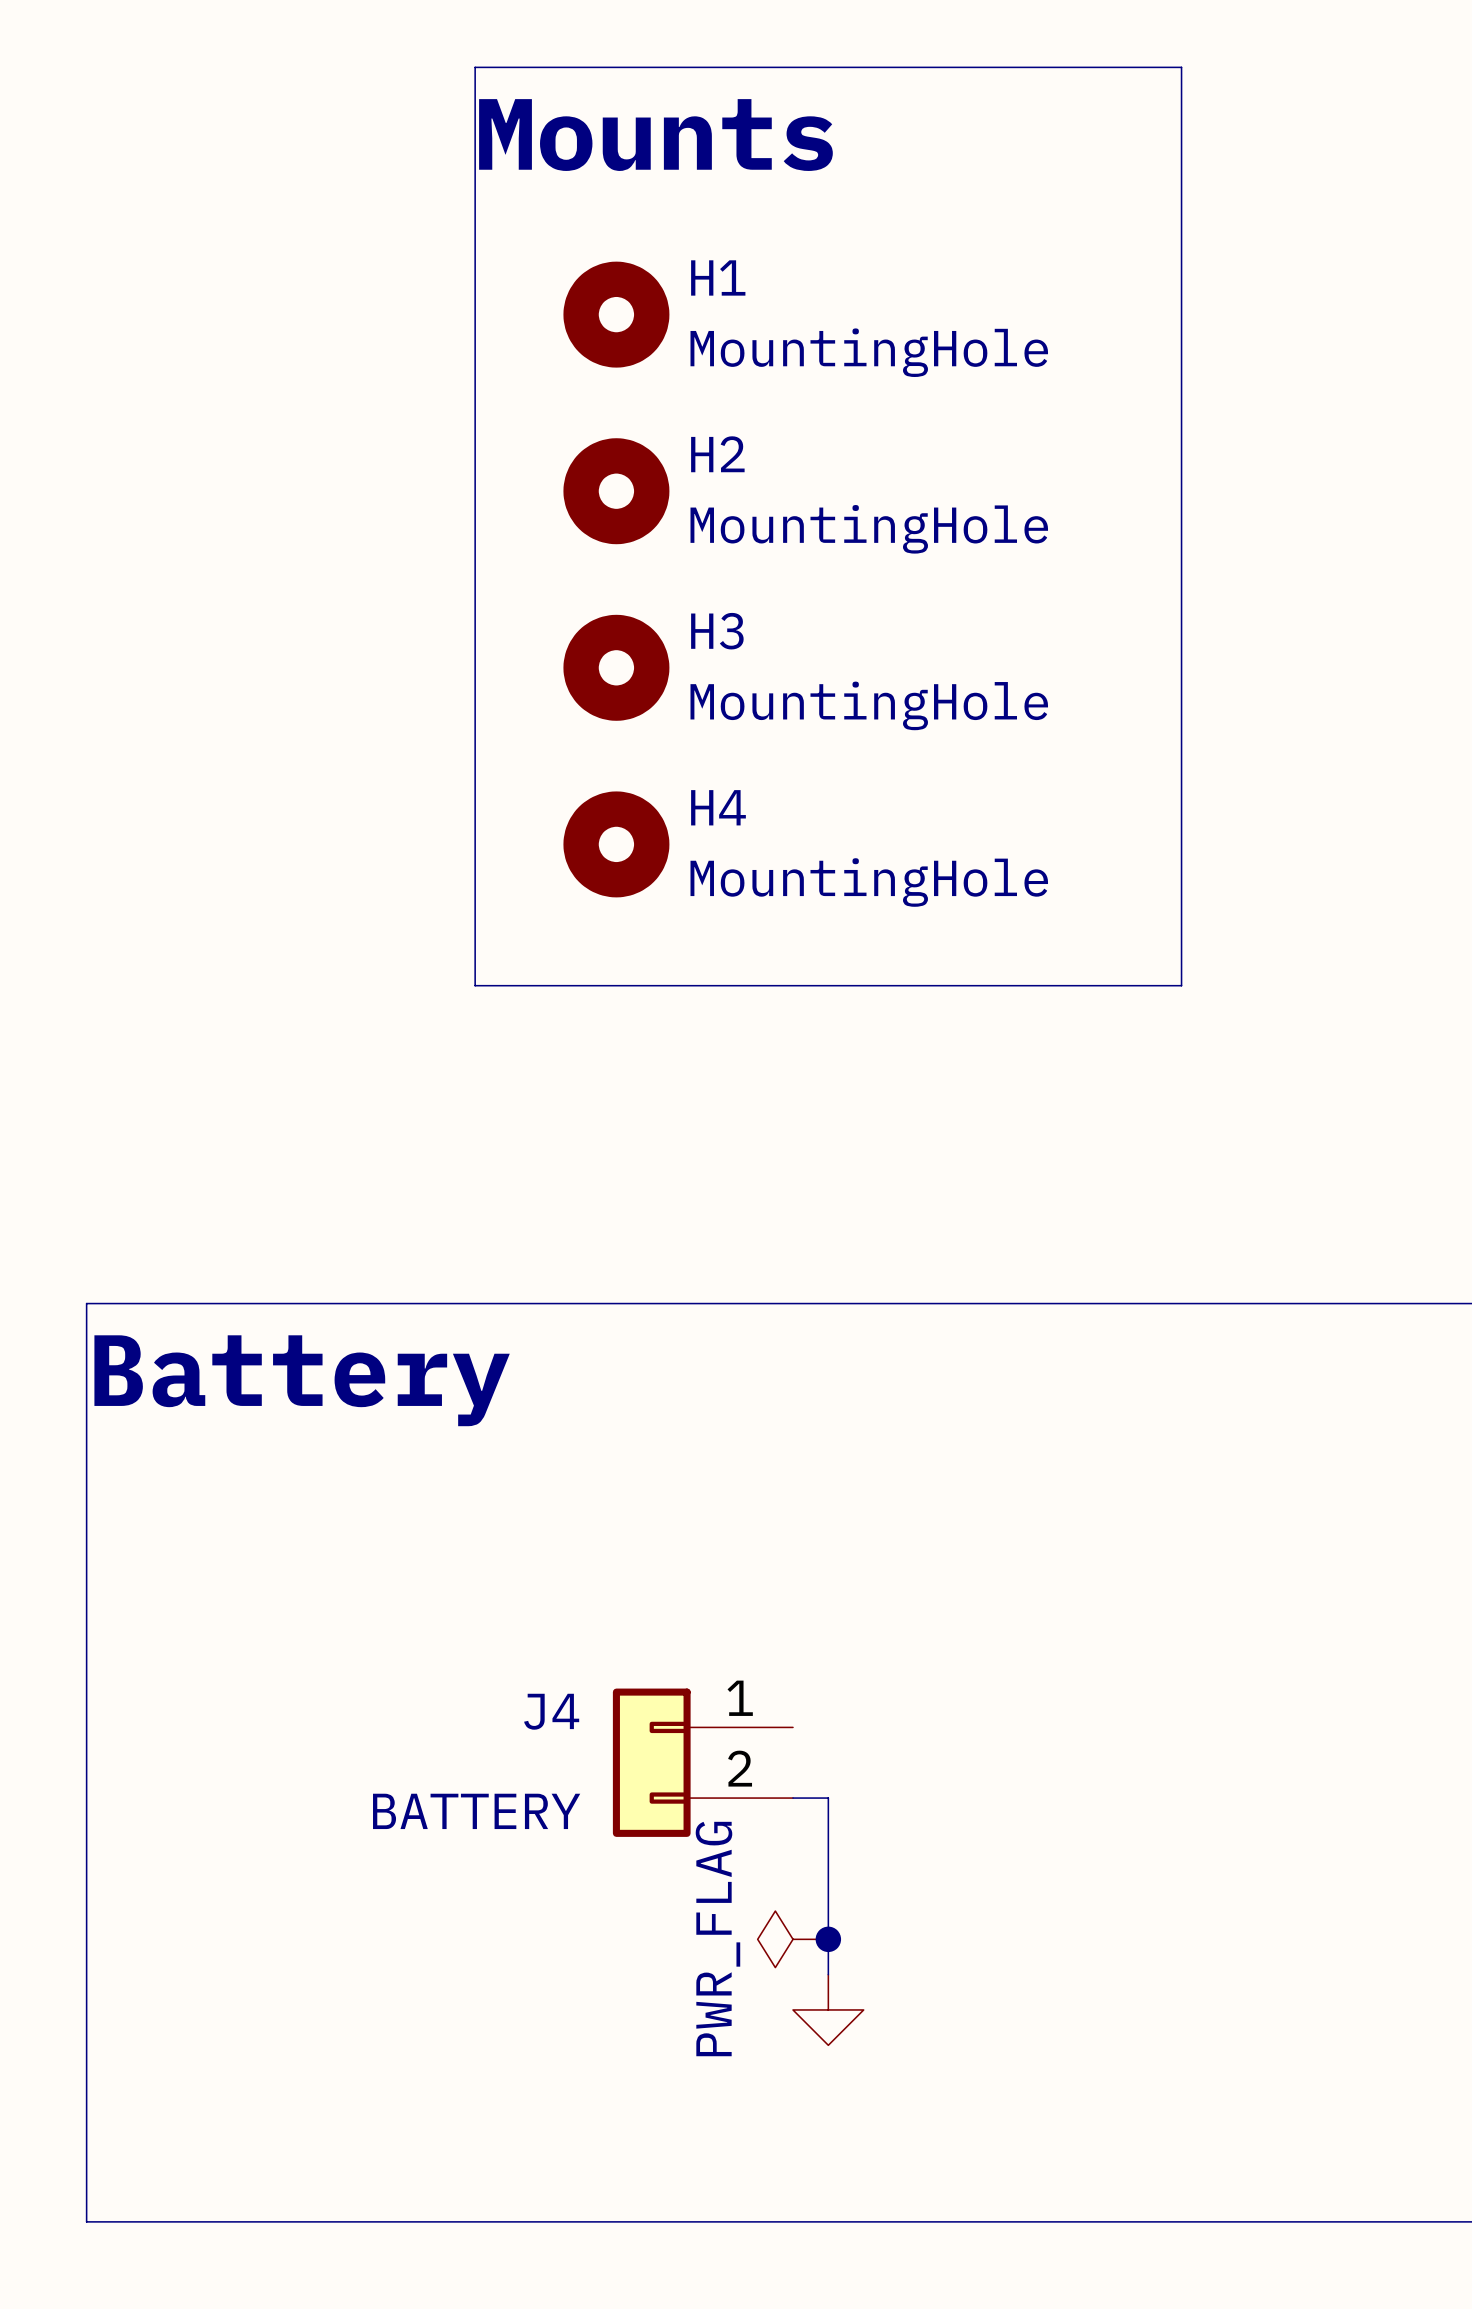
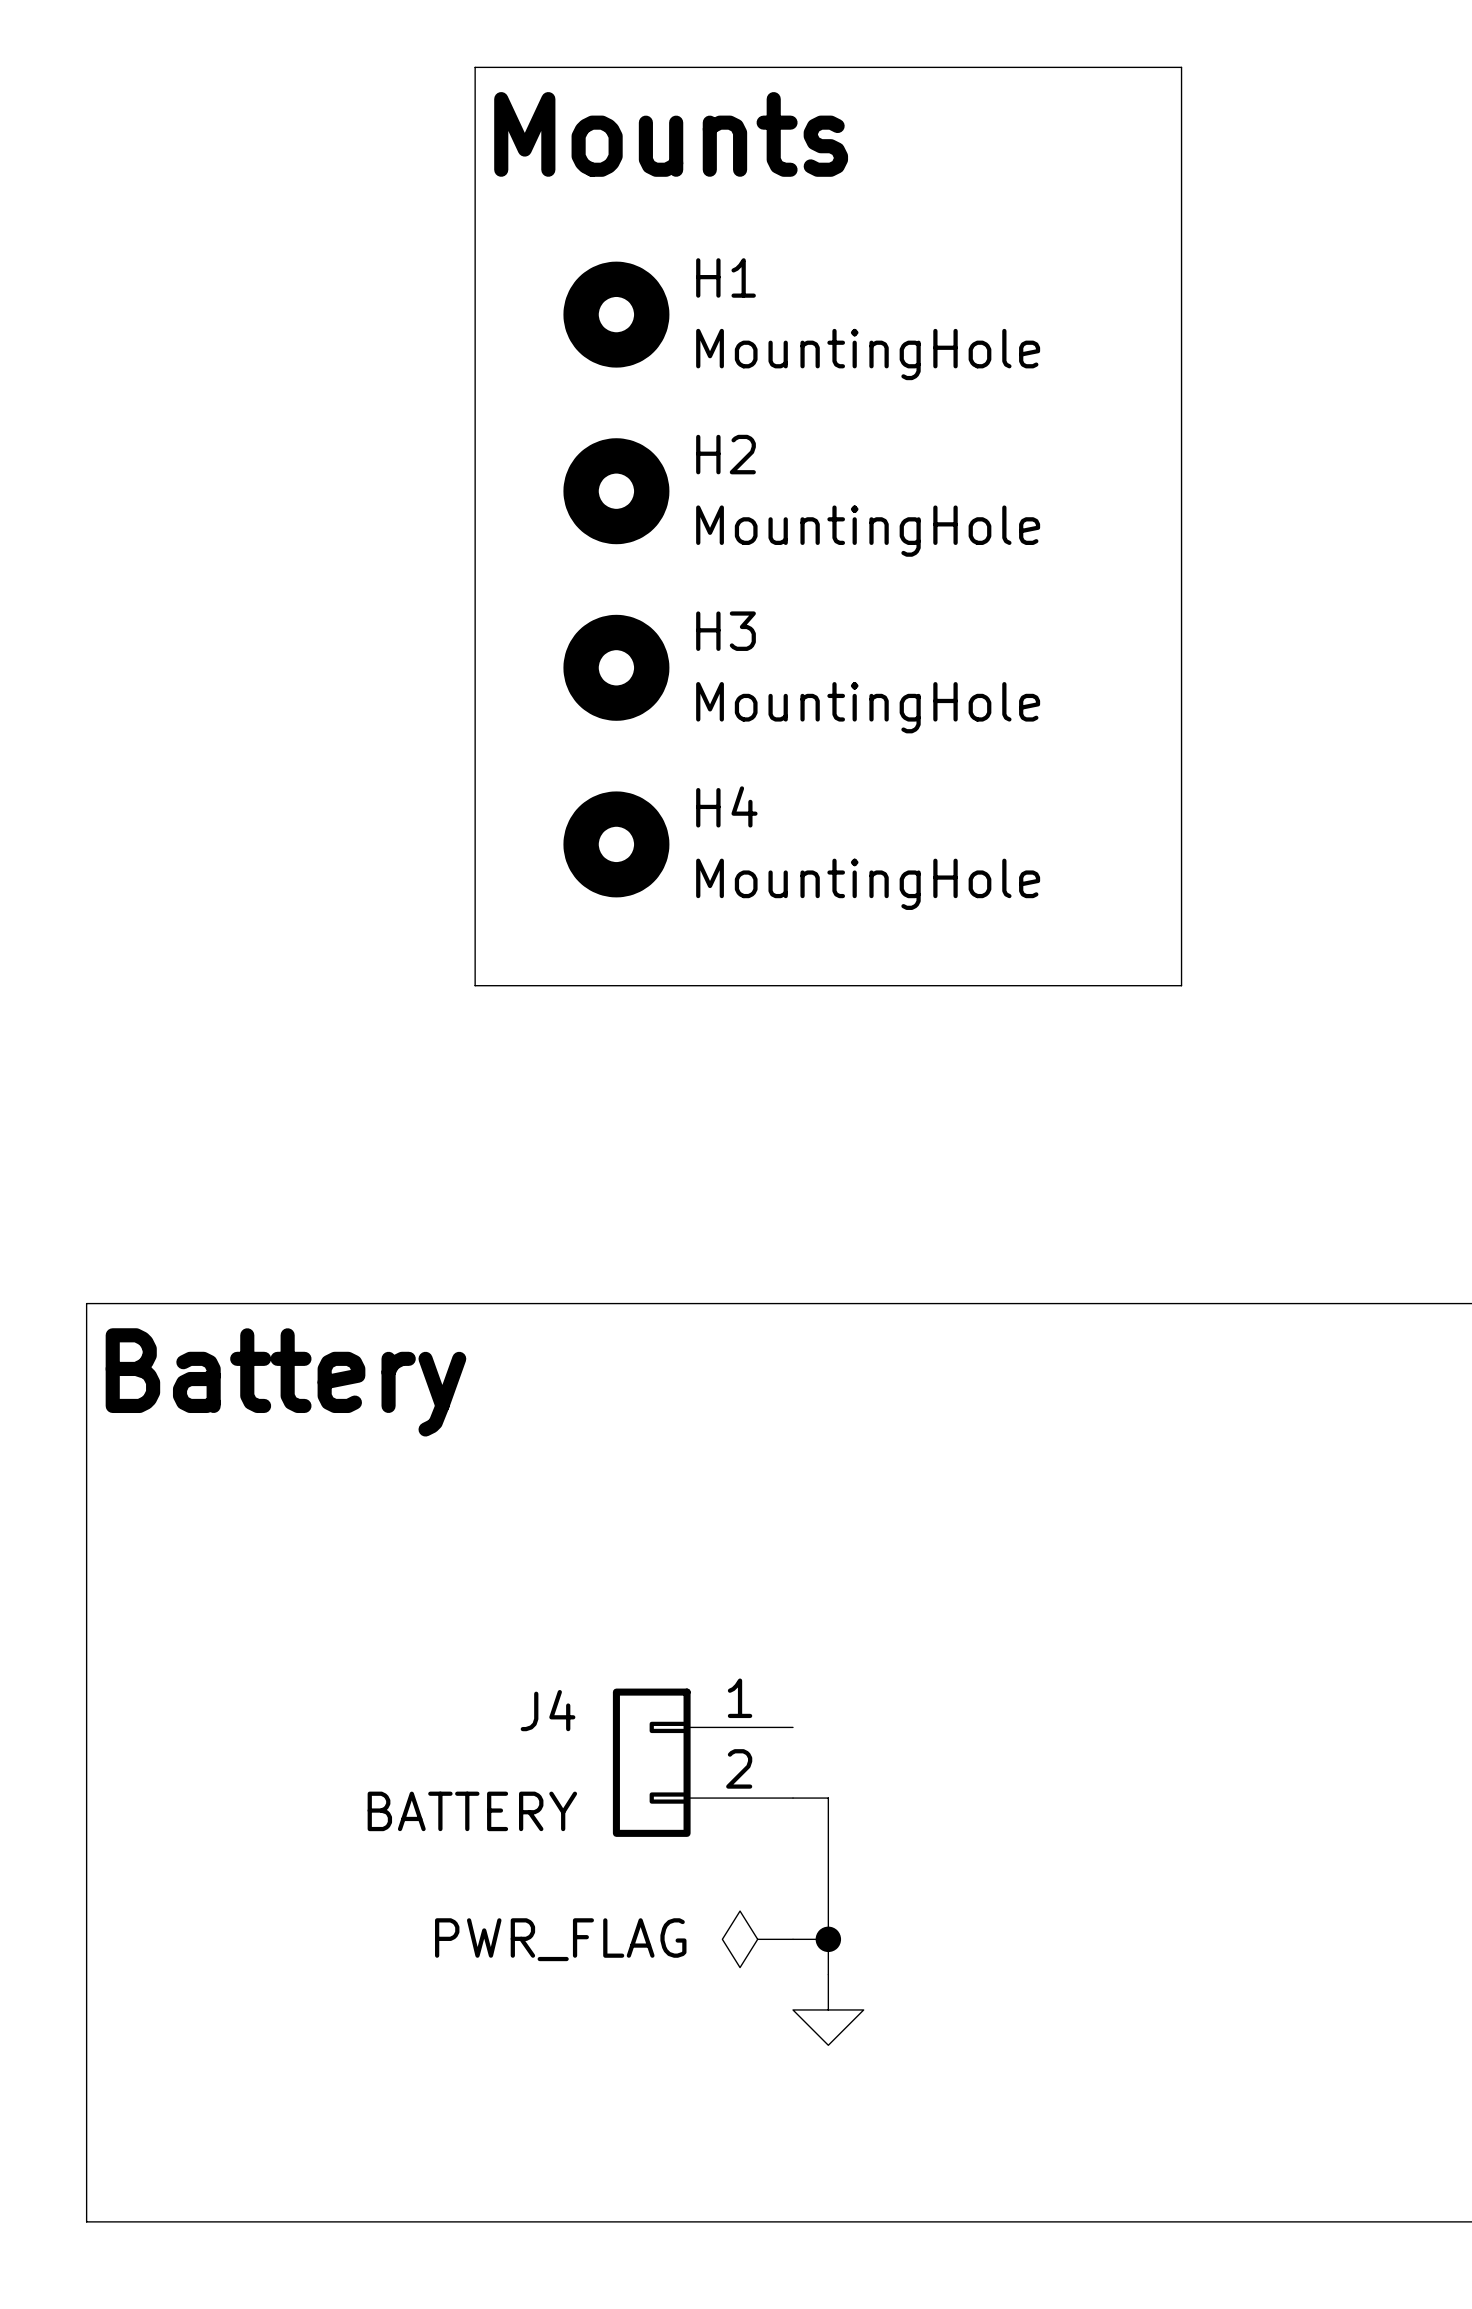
power symbol text rotation: 0° (717, 1939) -> 90° clockwise (560, 1939)
power symbol position: PWR_FLAG (793, 1939) -> PWR_FLAG (757, 1939)

